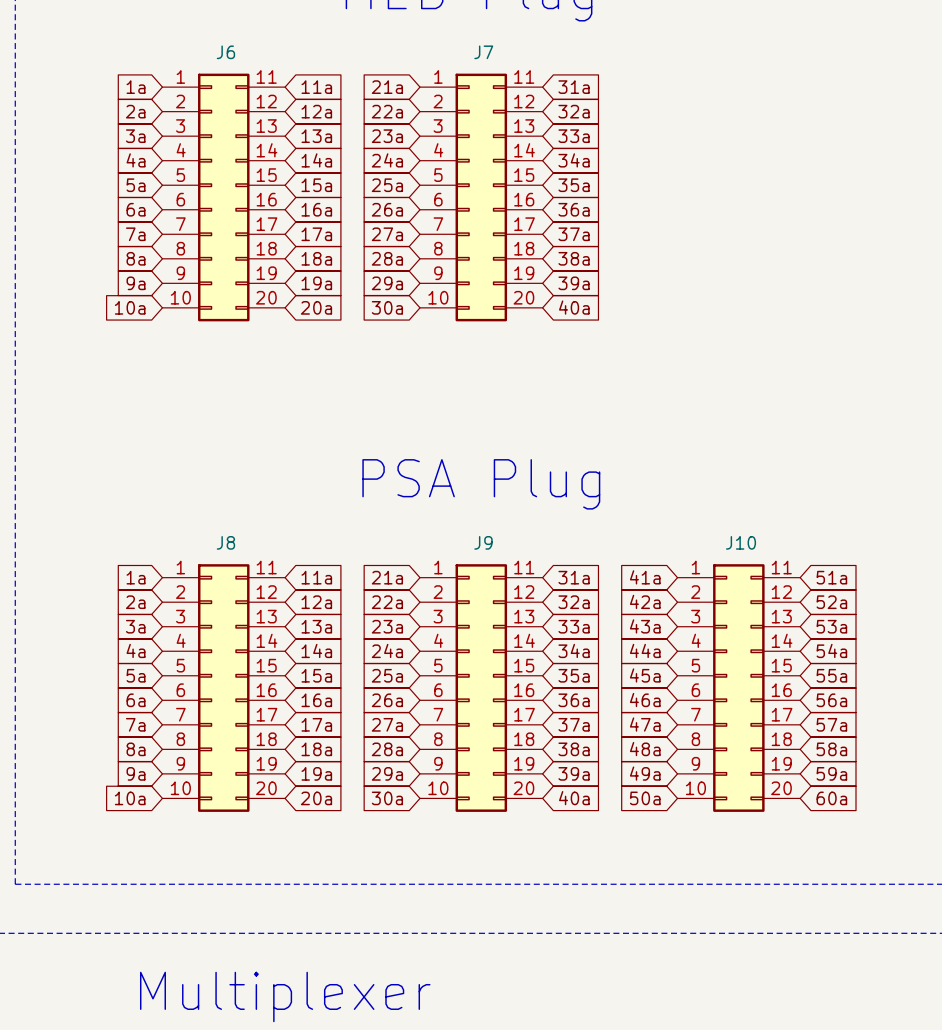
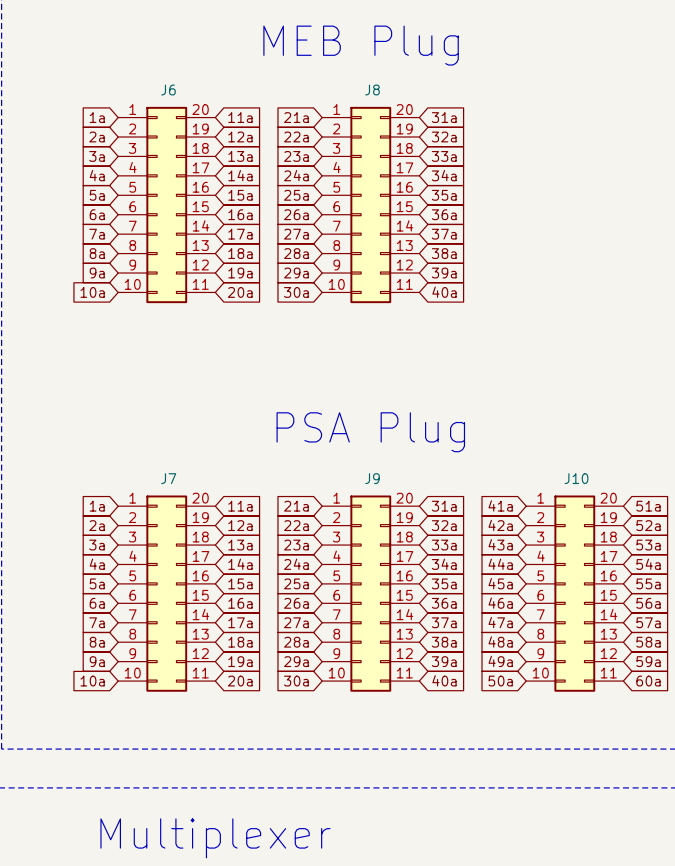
J6 symbol: [162, 73, 286, 322] -> [118, 106, 216, 304]
J7 symbol: [419, 73, 543, 322] -> [118, 495, 216, 692]
J8 symbol: [162, 564, 286, 812] -> [322, 106, 420, 304]
J9 symbol: [419, 564, 543, 812] -> [322, 495, 420, 692]
J10 symbol: [677, 564, 801, 812] -> [526, 495, 624, 692]

